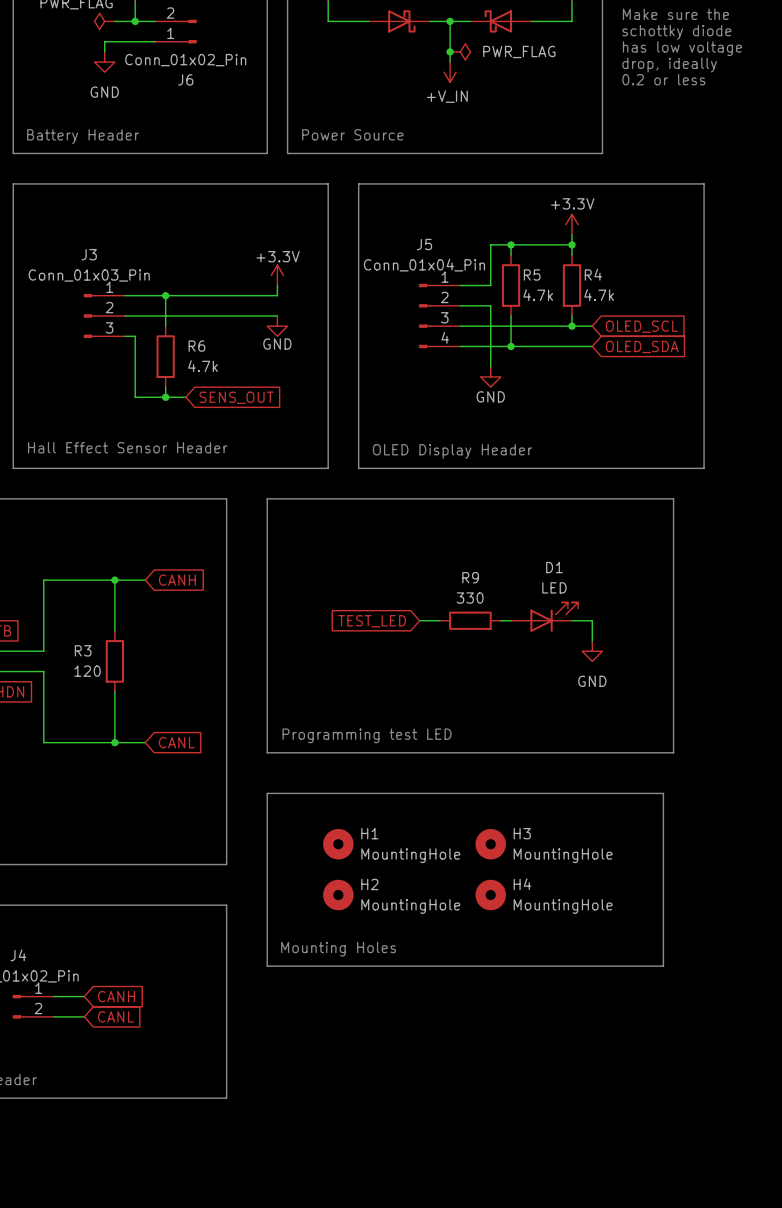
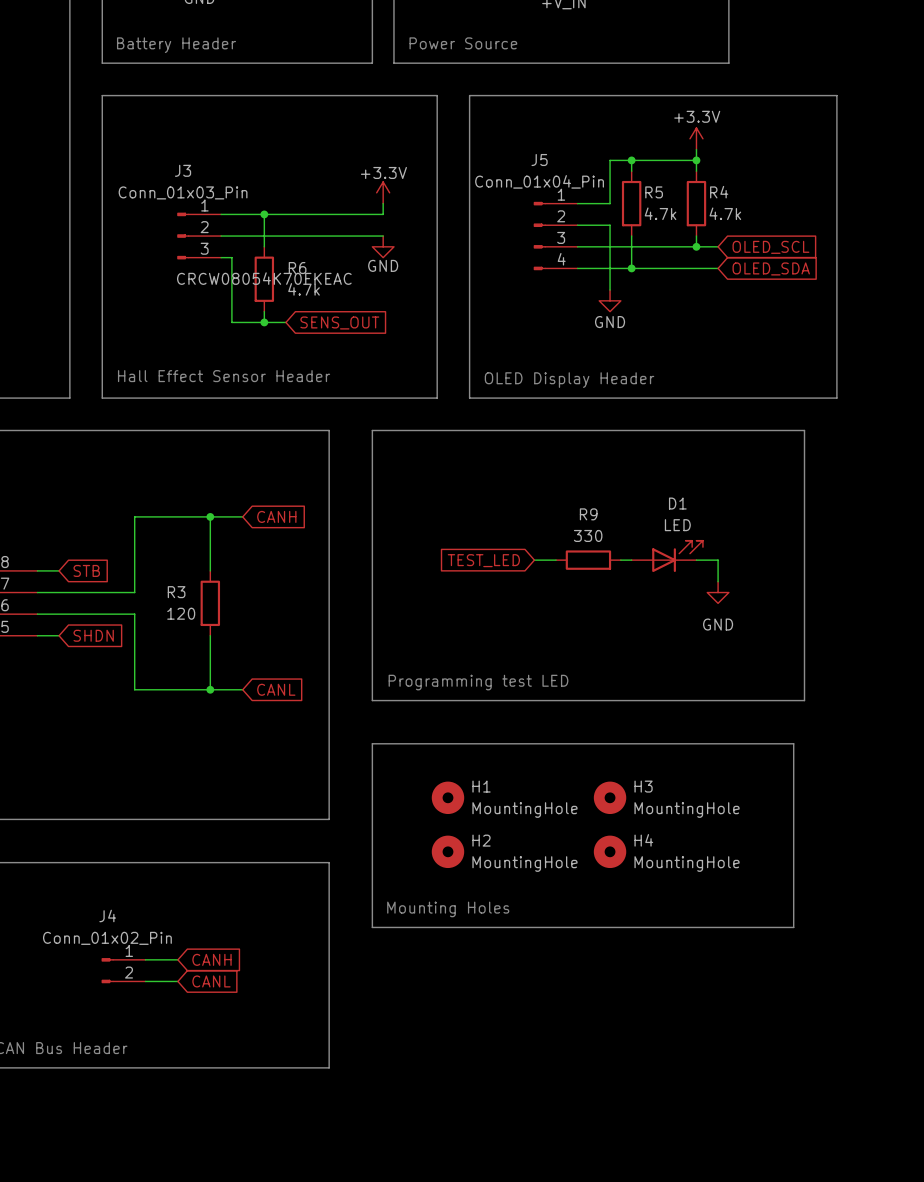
R6 text: none -> CRCW08054K70FKEAC (264, 278)

